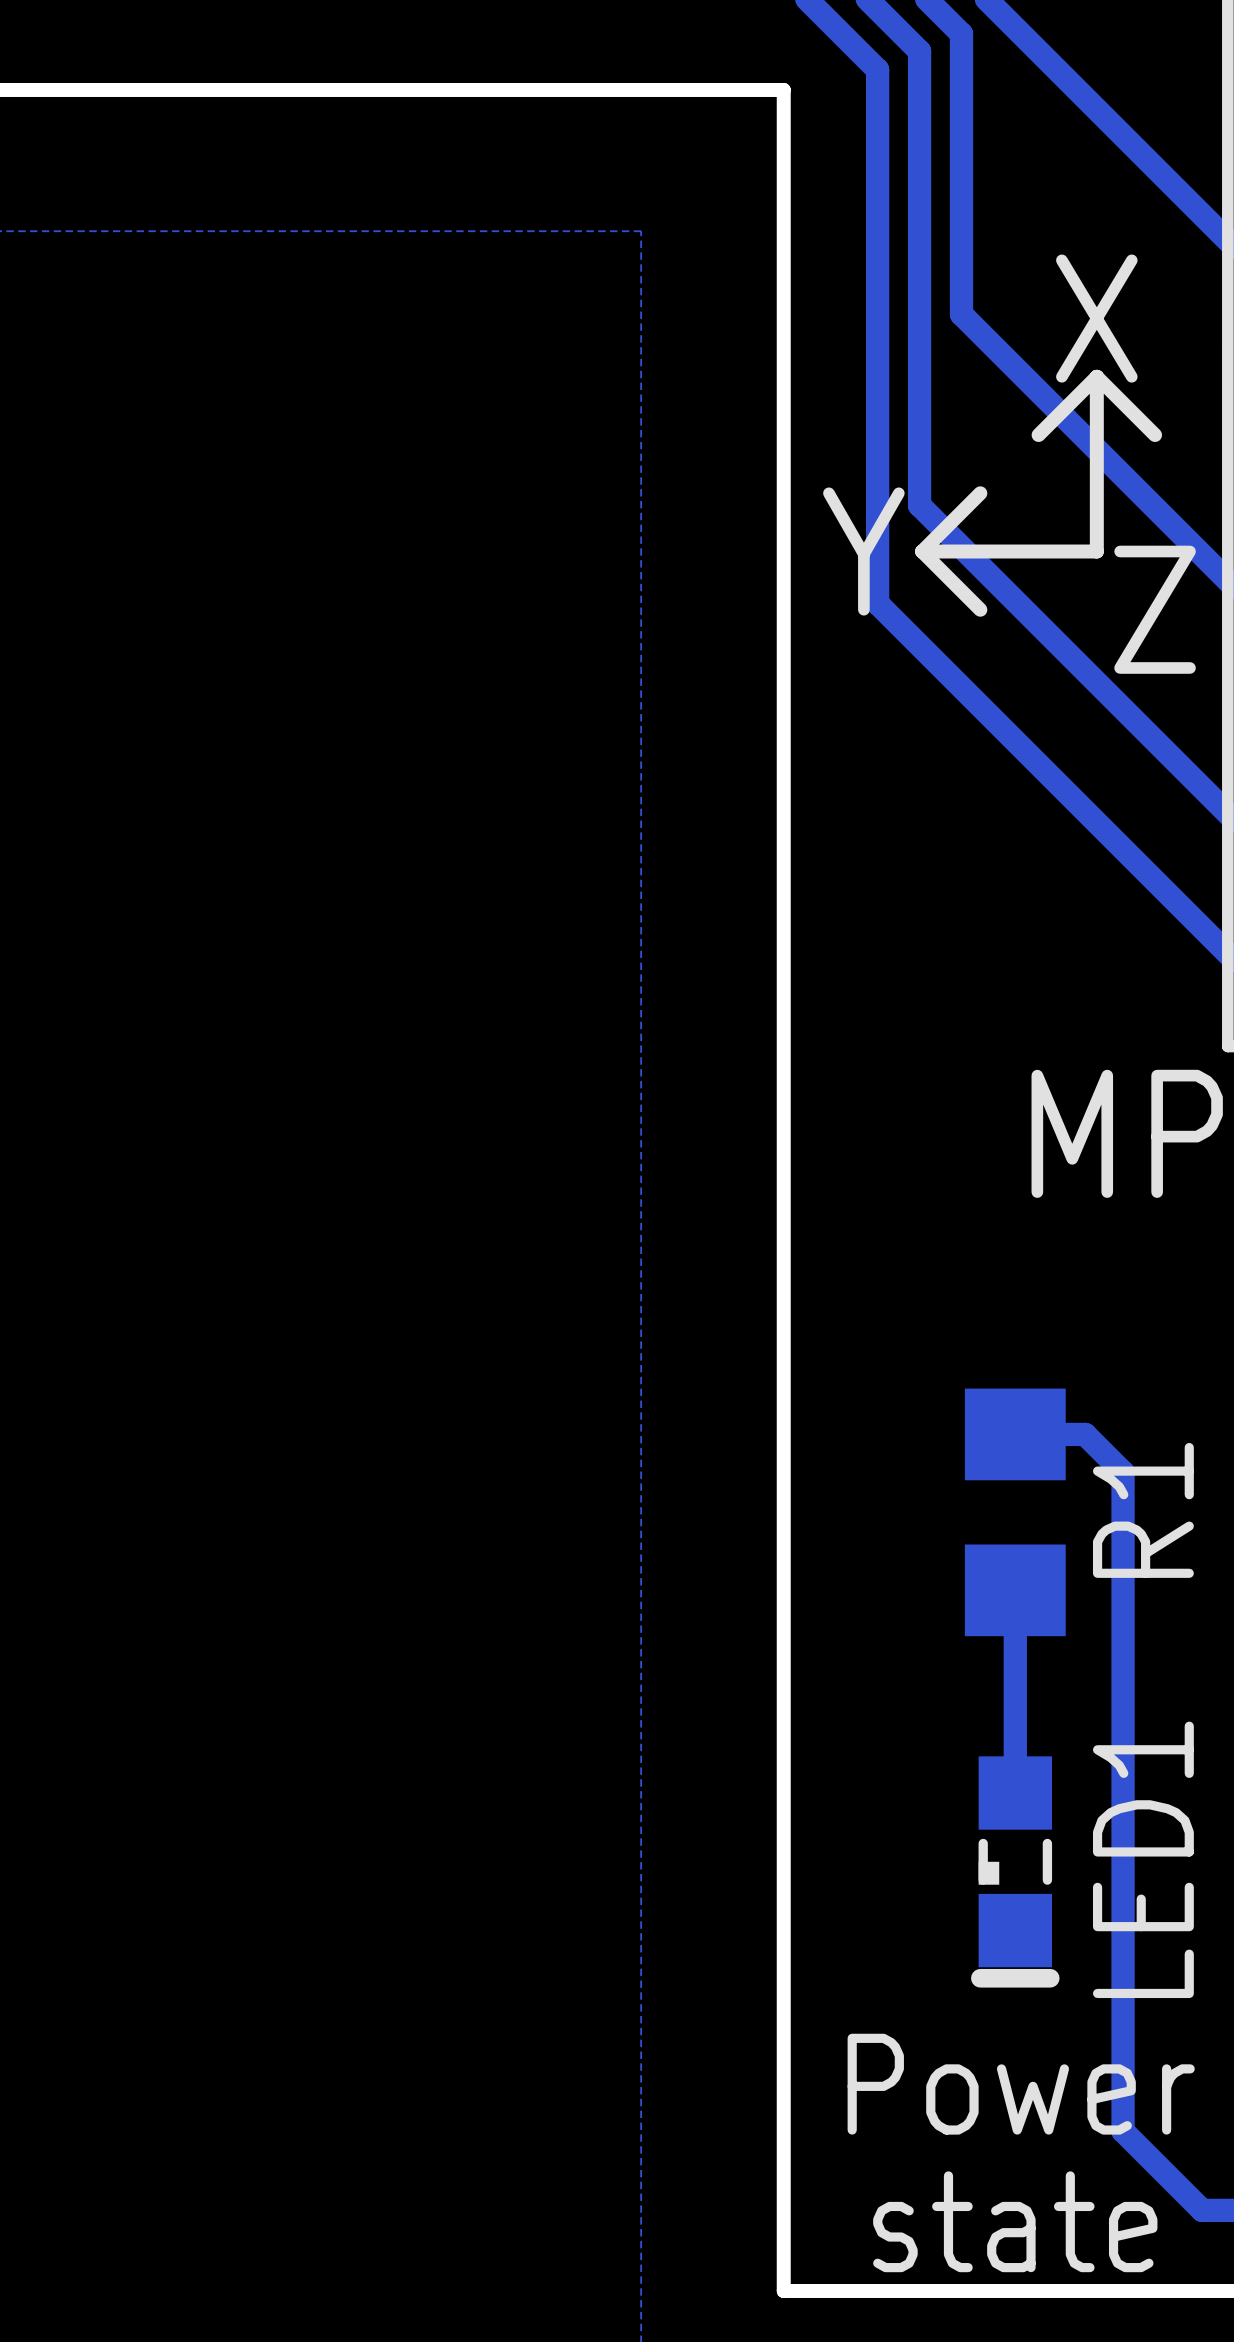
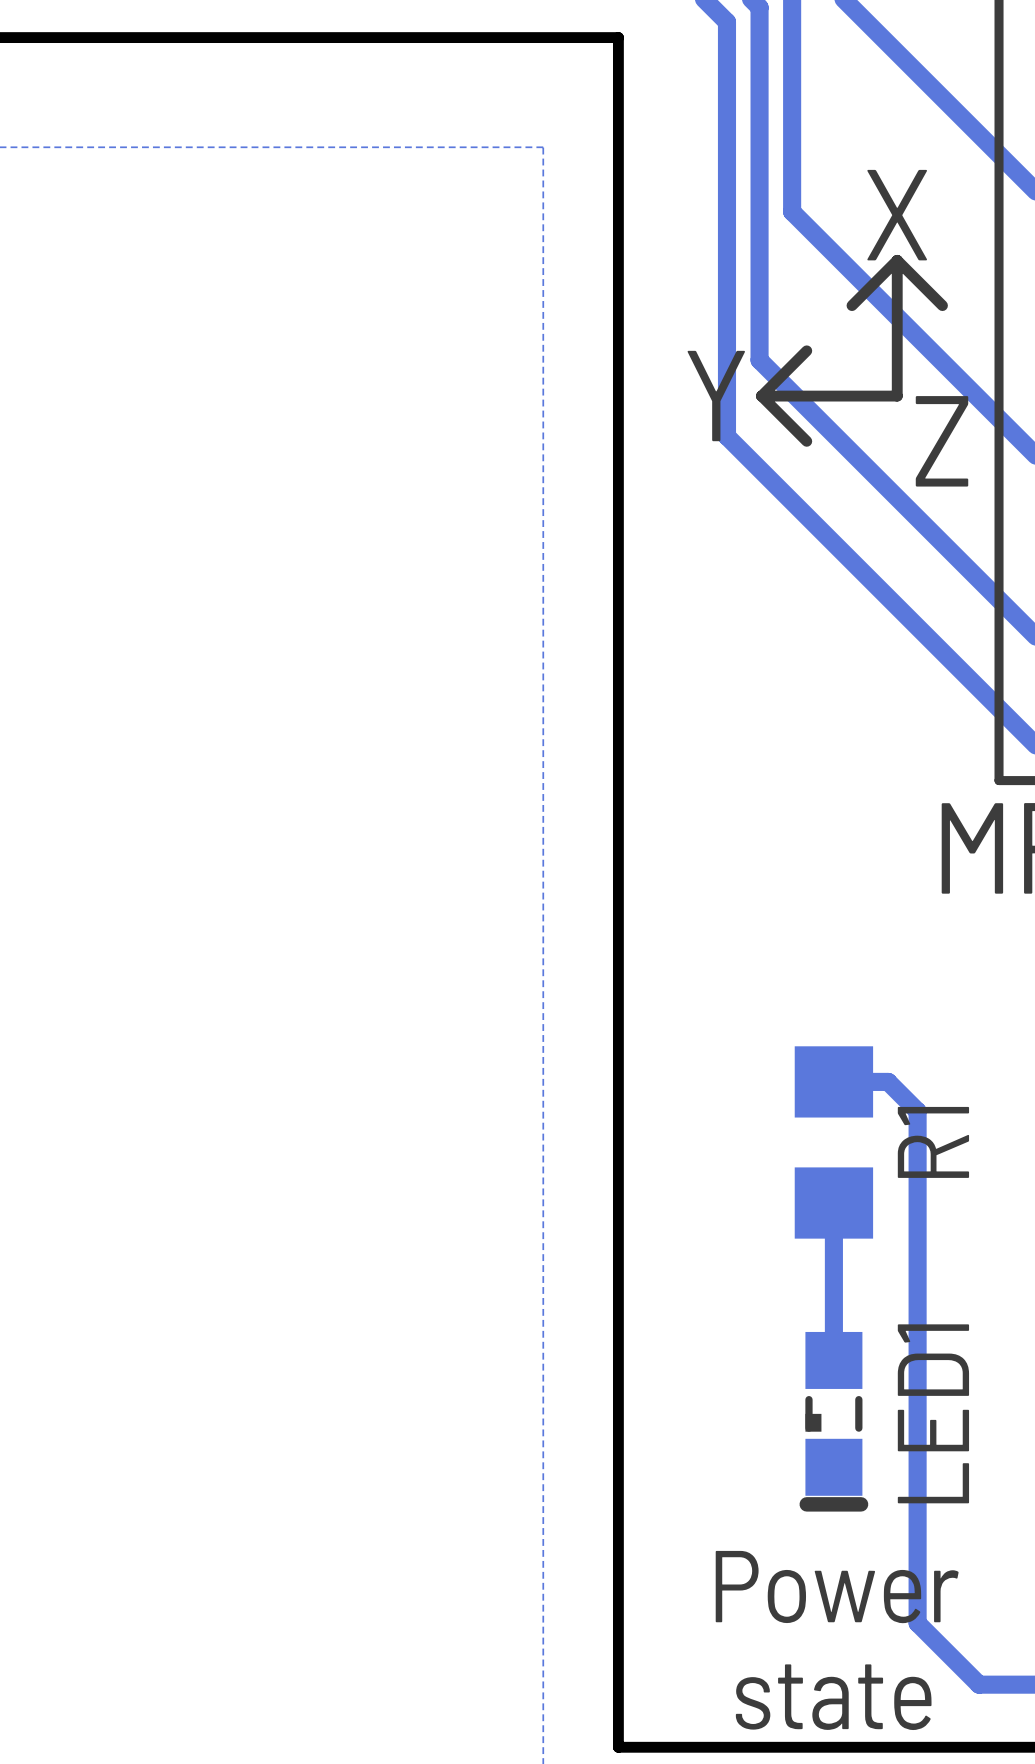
board edge: (737, 89) (783, 89) (783, 2290) -> (618, 37) (618, 1747) (654, 1747)

